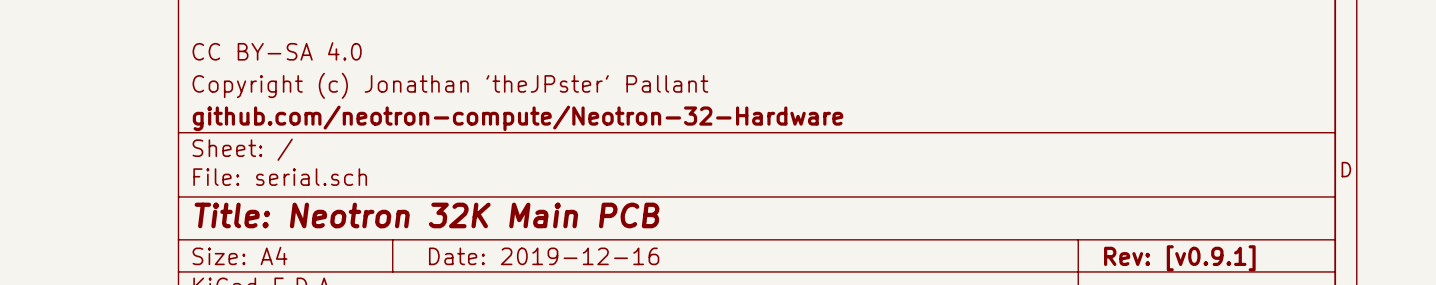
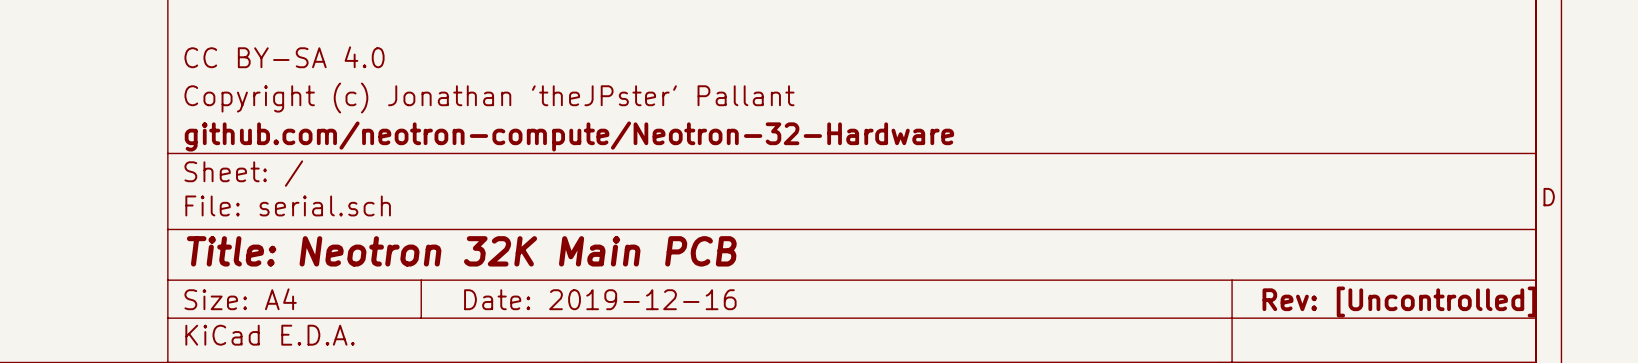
title block: Rev: [v0.9.1] (1179, 258) -> Rev: [Uncontrolled] (1399, 301)

